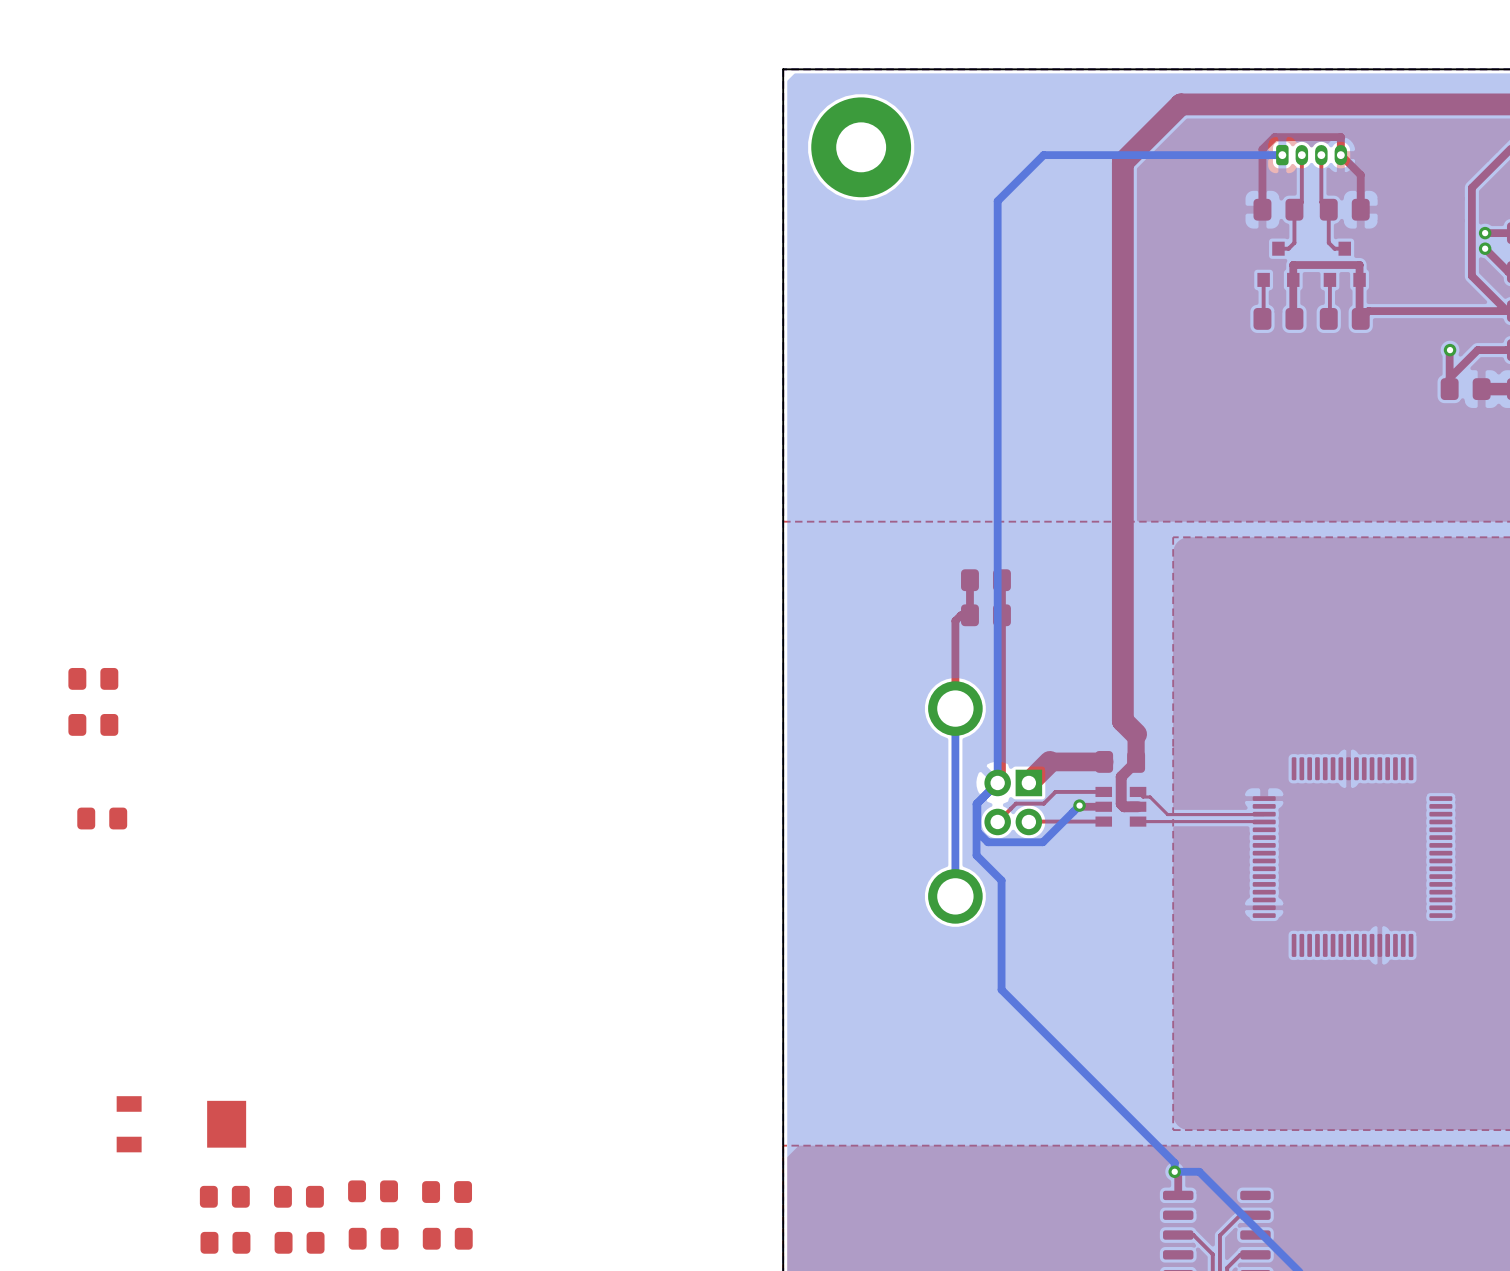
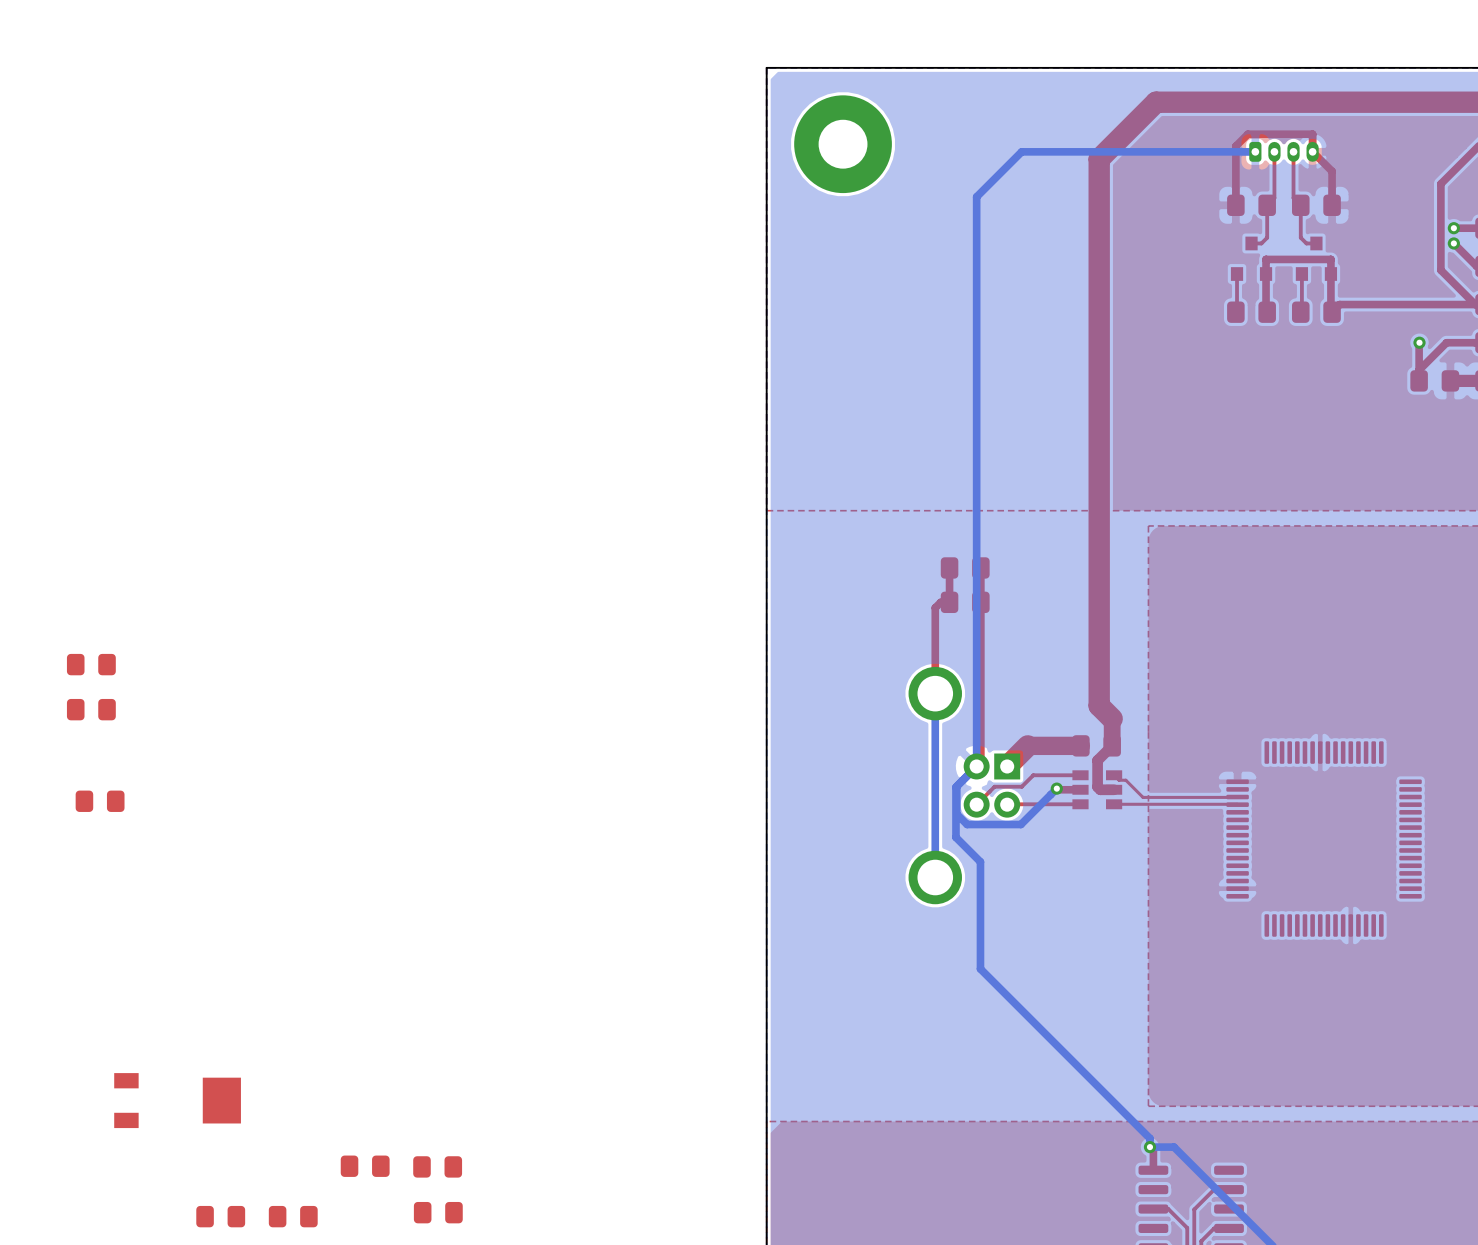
part: (224, 1196) -> none
part: (298, 1196) -> none
part: (373, 1238) -> none

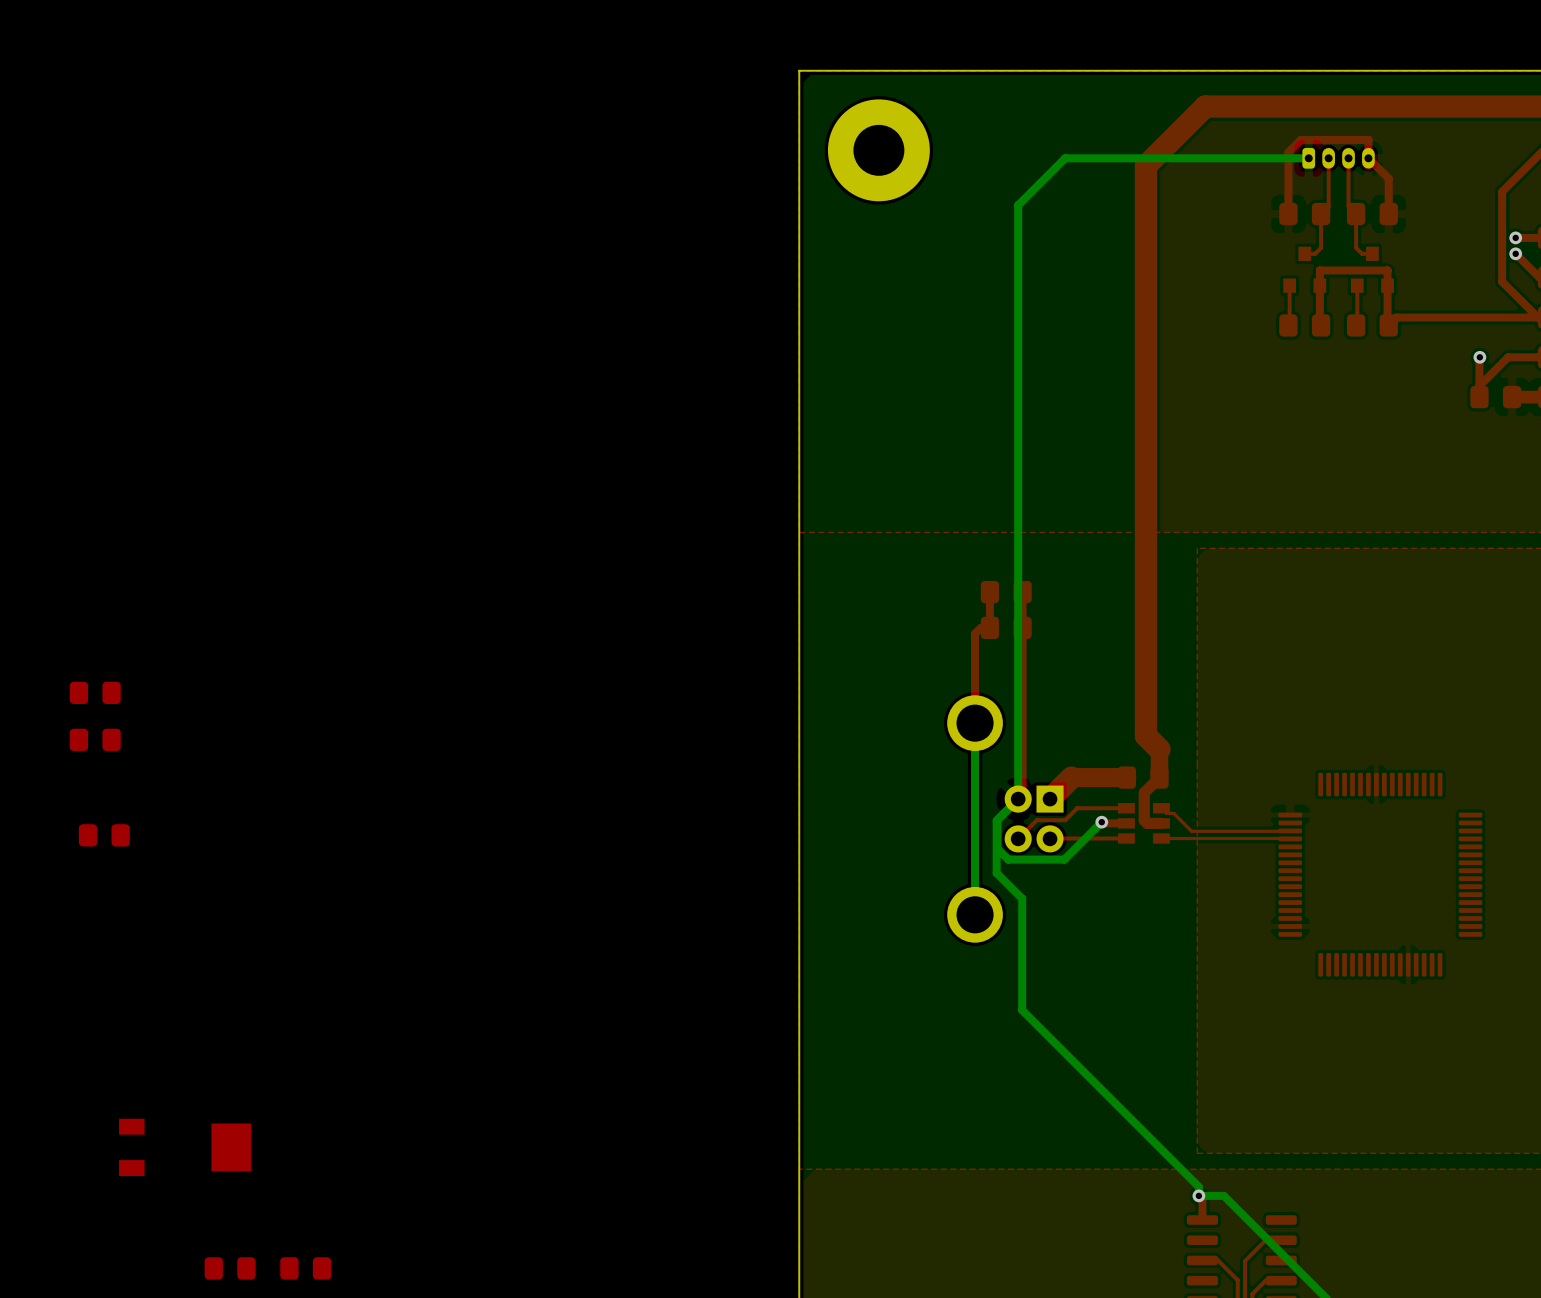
part: (365, 1166) -> none
part: (437, 1166) -> none
part: (438, 1212) -> none

